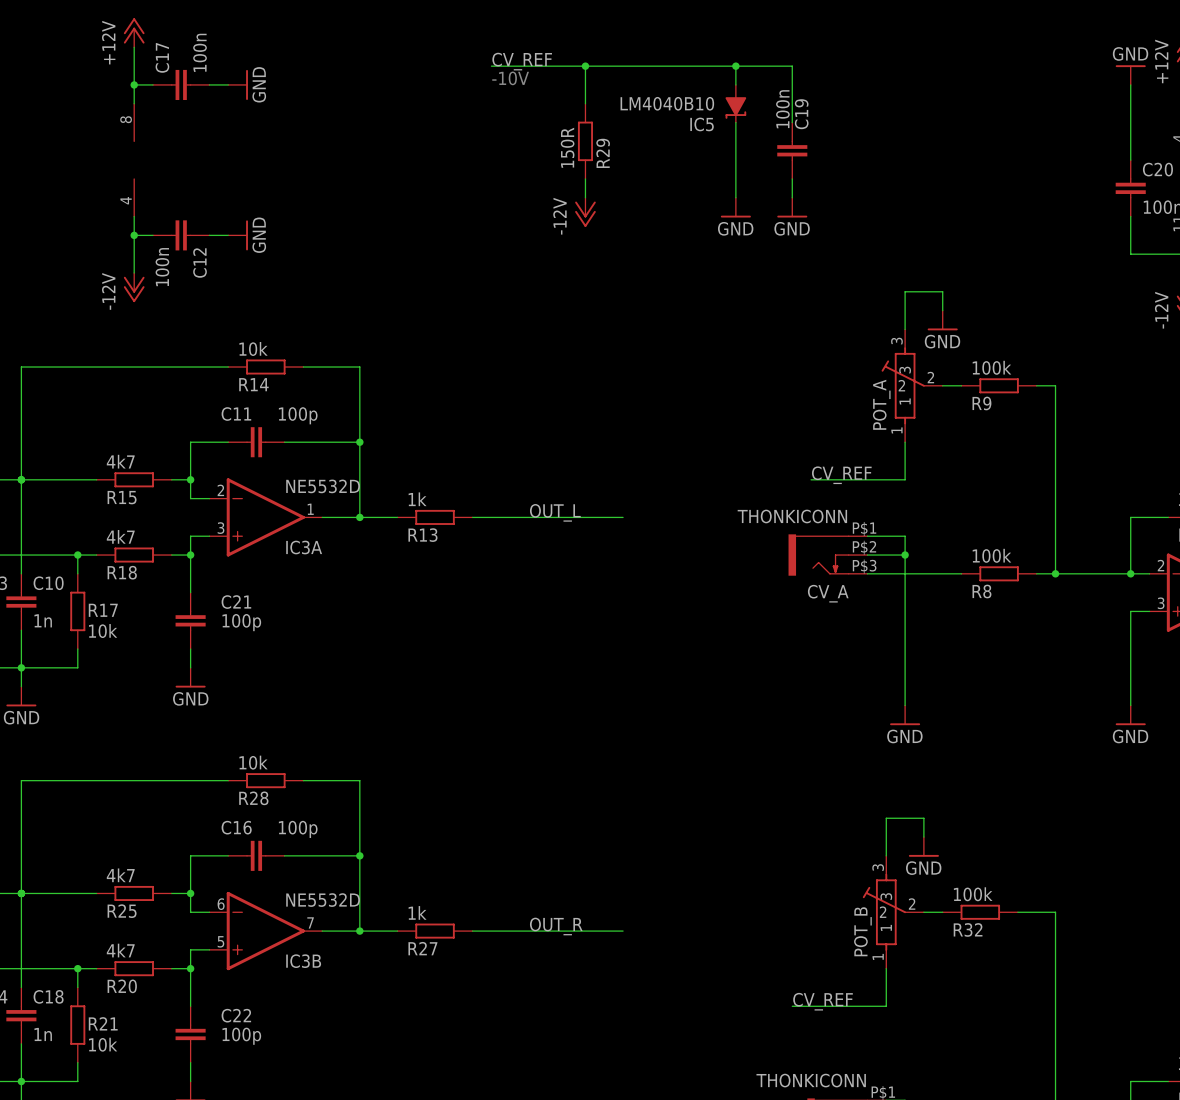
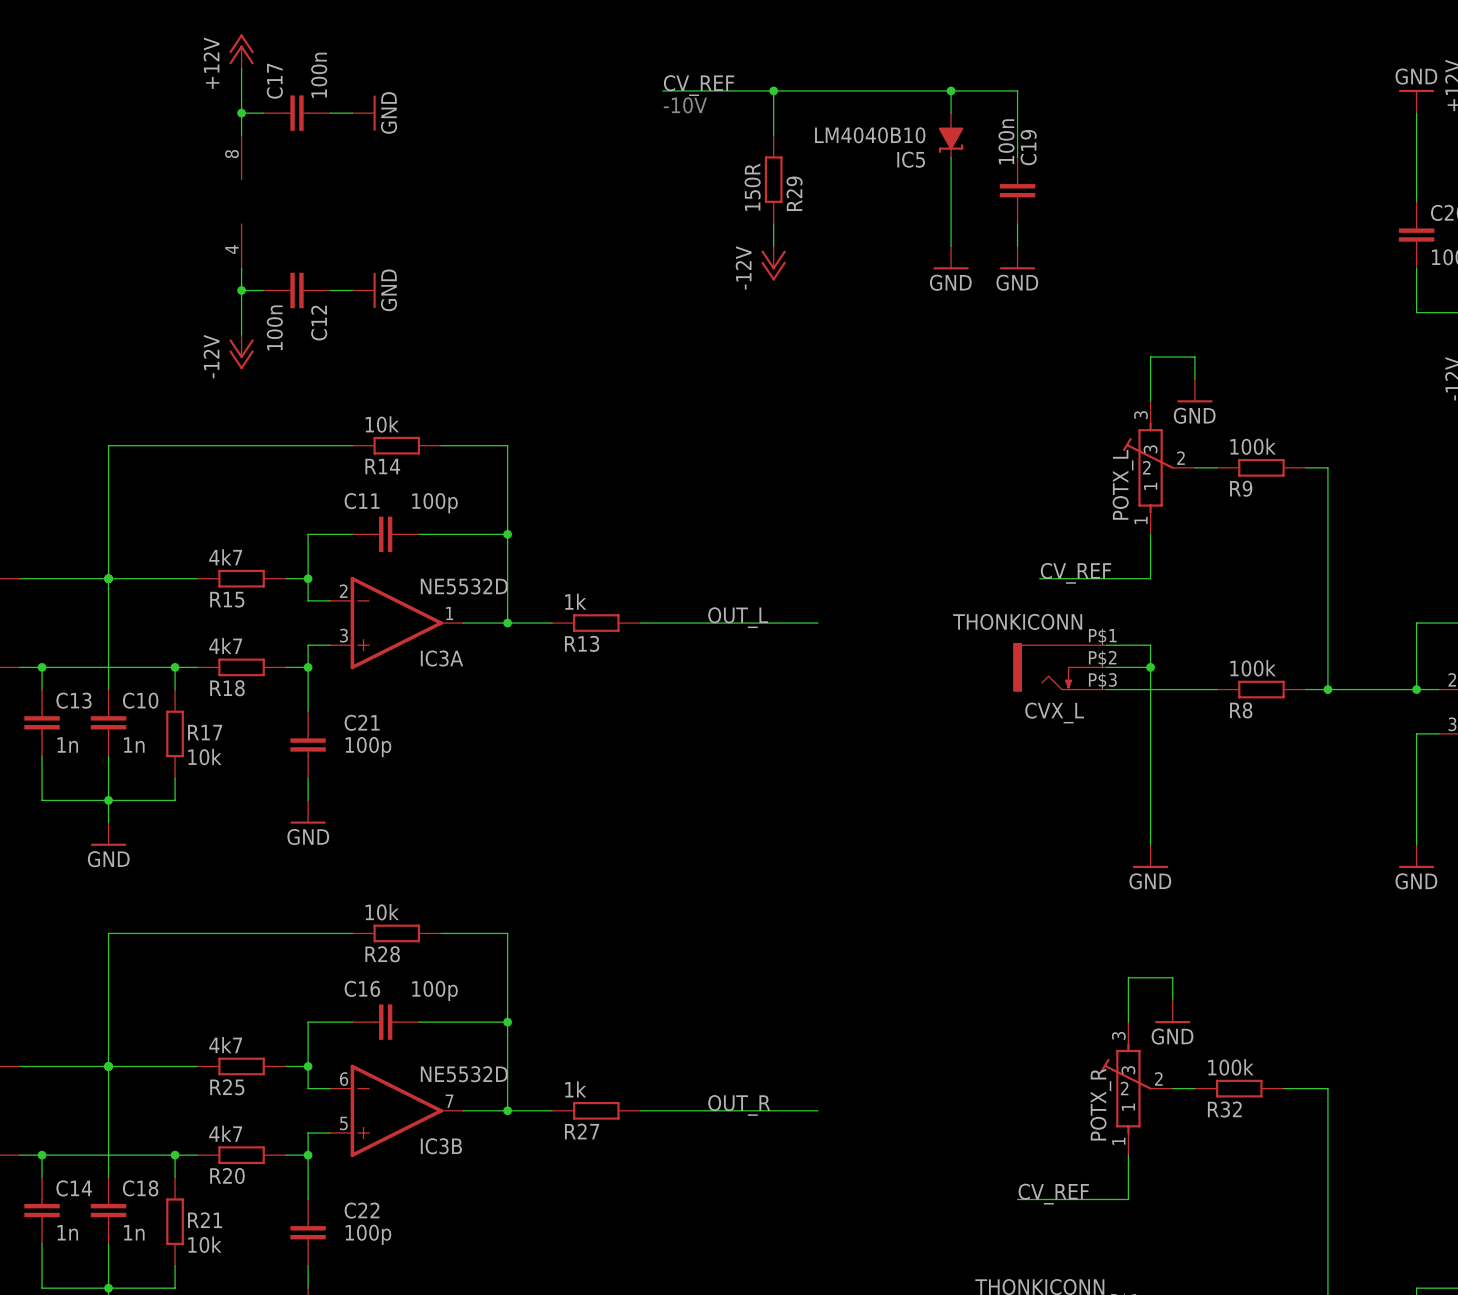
POT_A name: POT_A (881, 404) -> POTX_L (1123, 484)
CV_A name: CV_A (828, 593) -> CVX_L (1054, 712)
POT_B name: POT_B (862, 931) -> POTX_R (1100, 1104)

